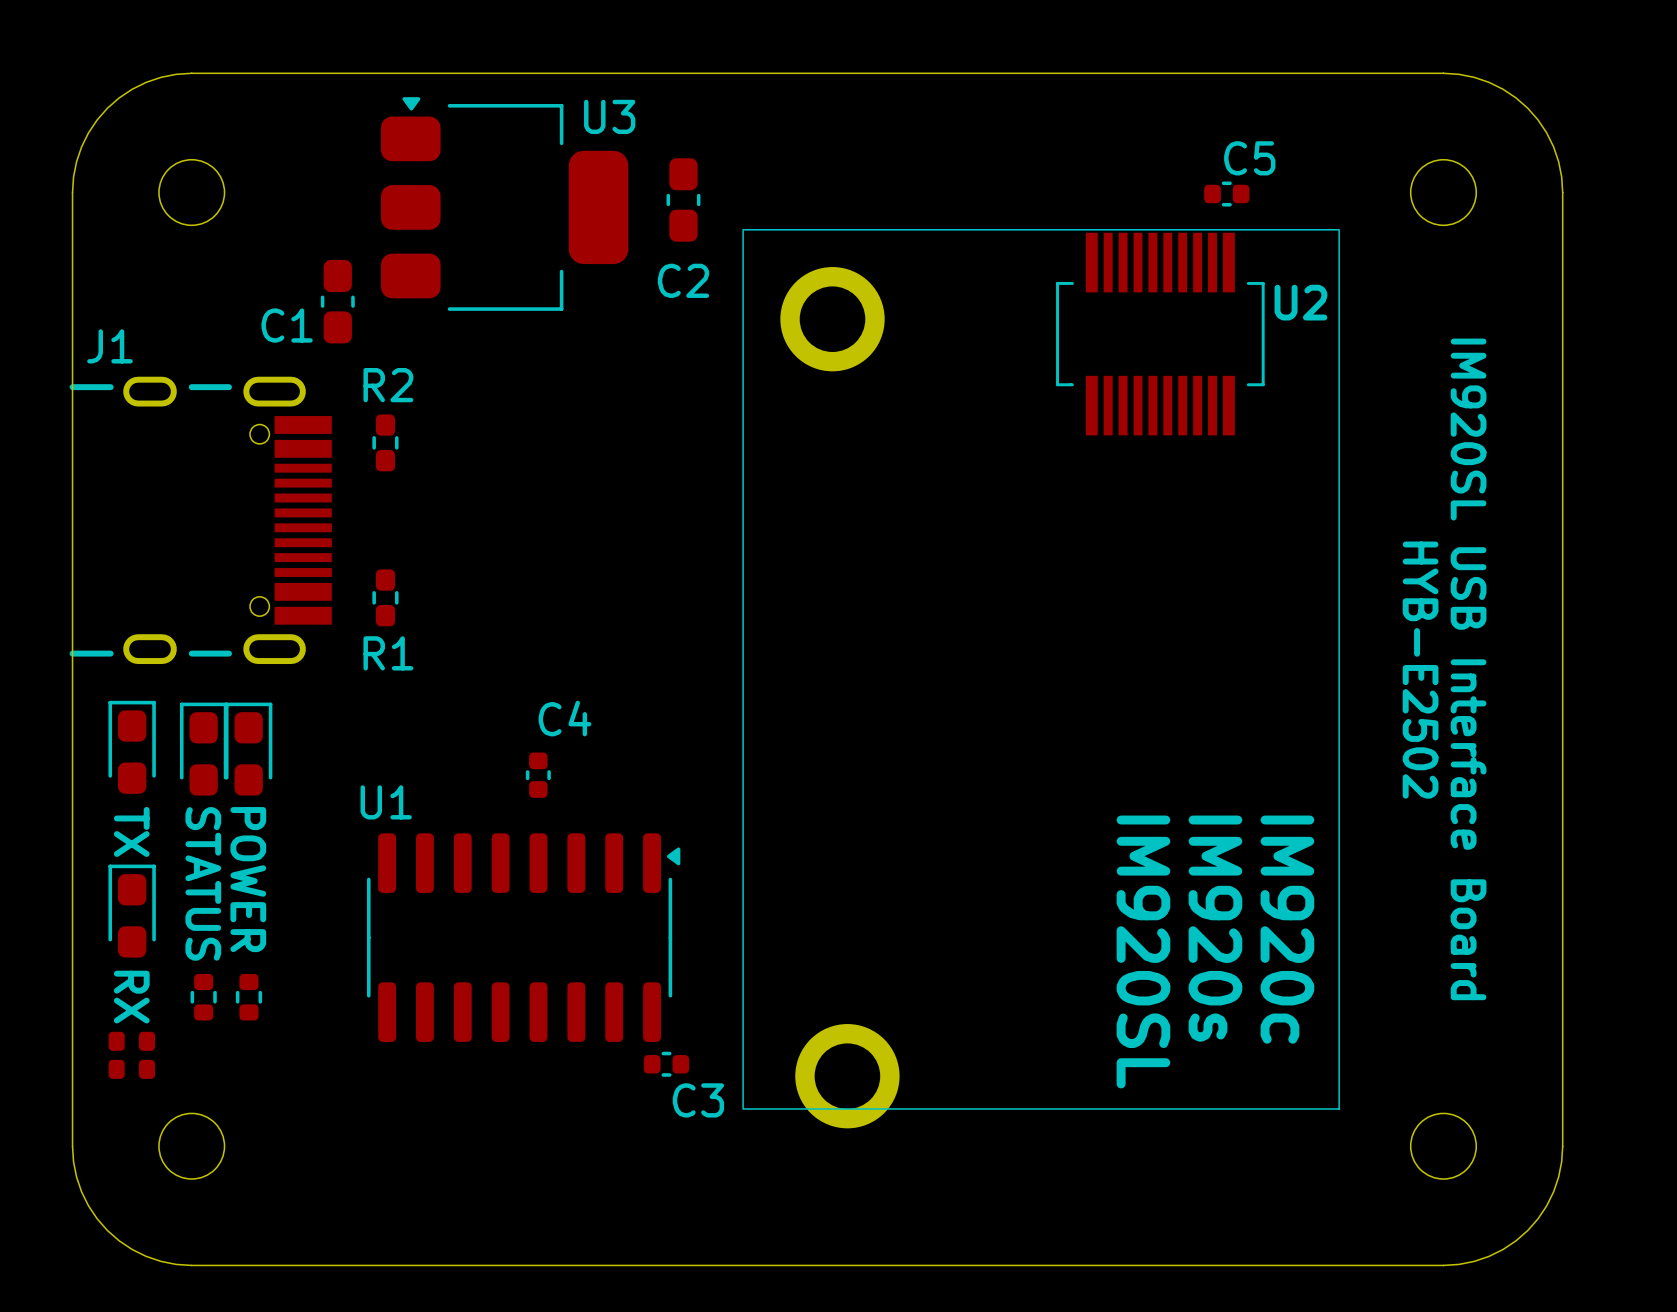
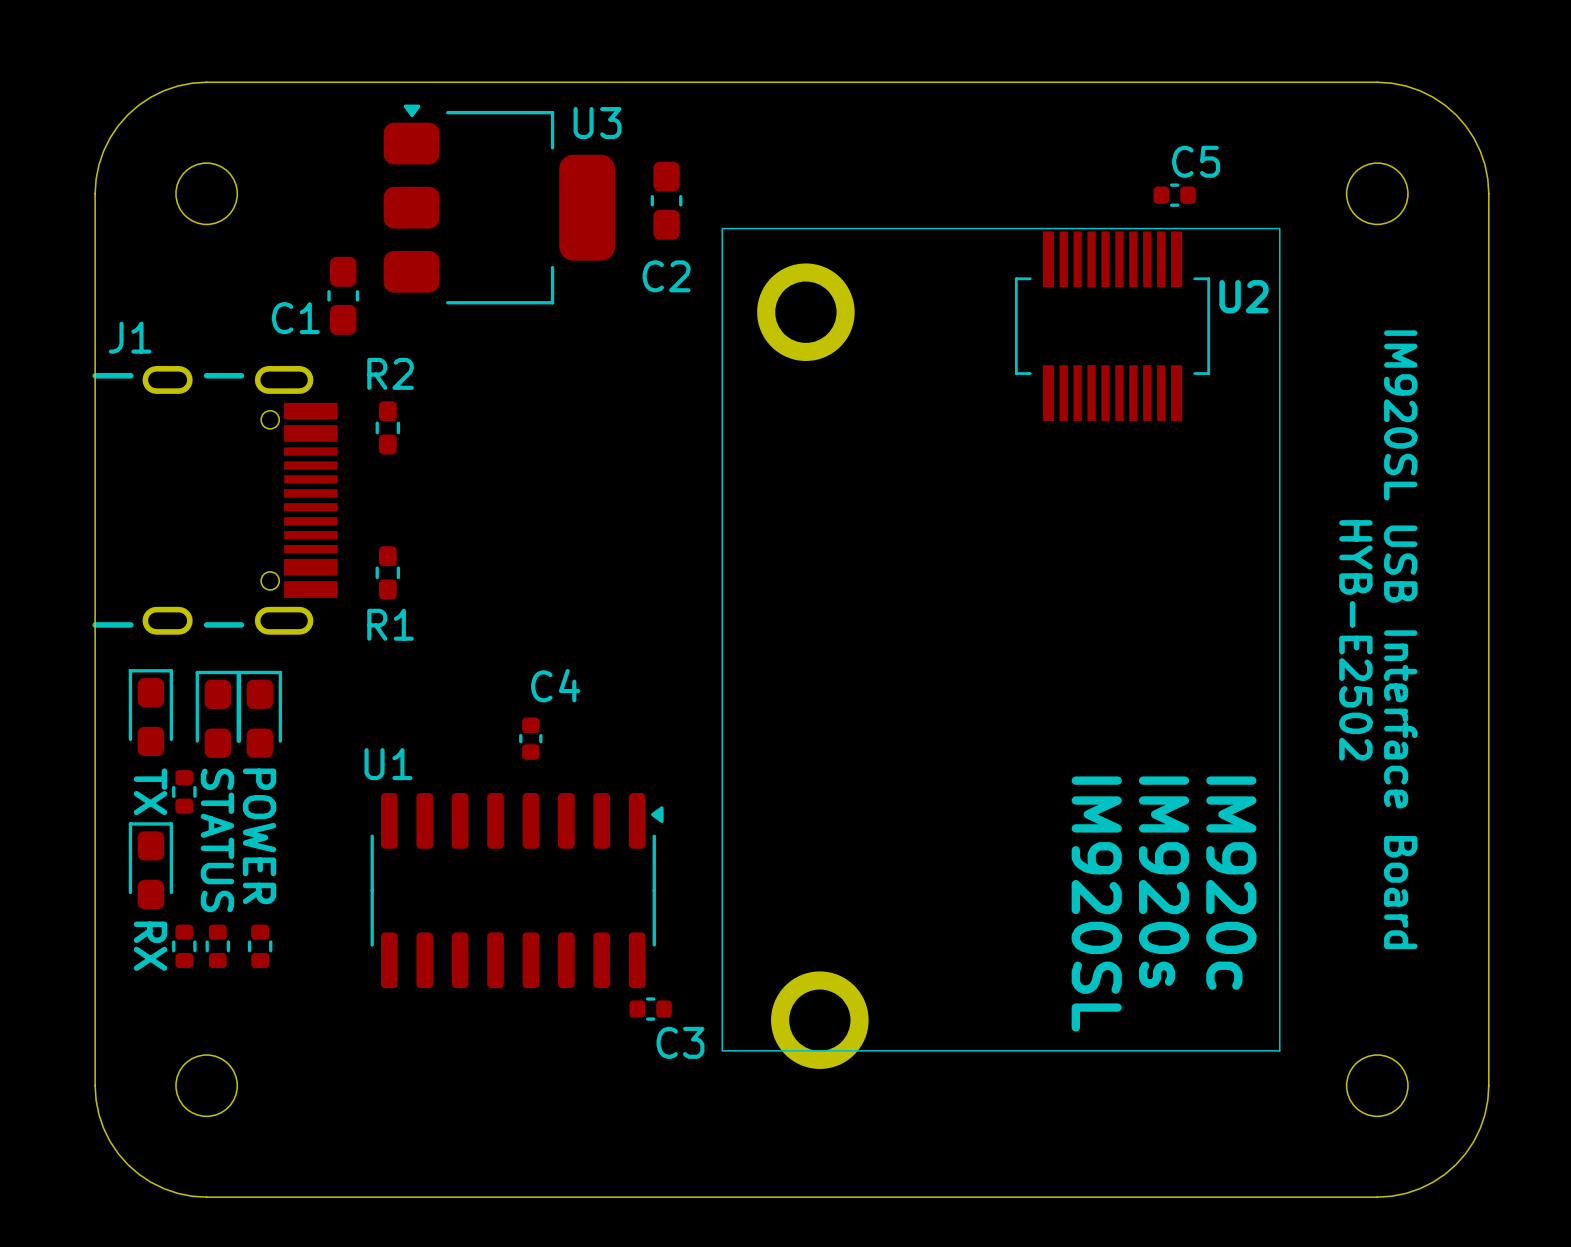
part: none -> (184, 791)
part: none -> (184, 946)
part: (131, 1041) -> none
part: (131, 1069) -> none

